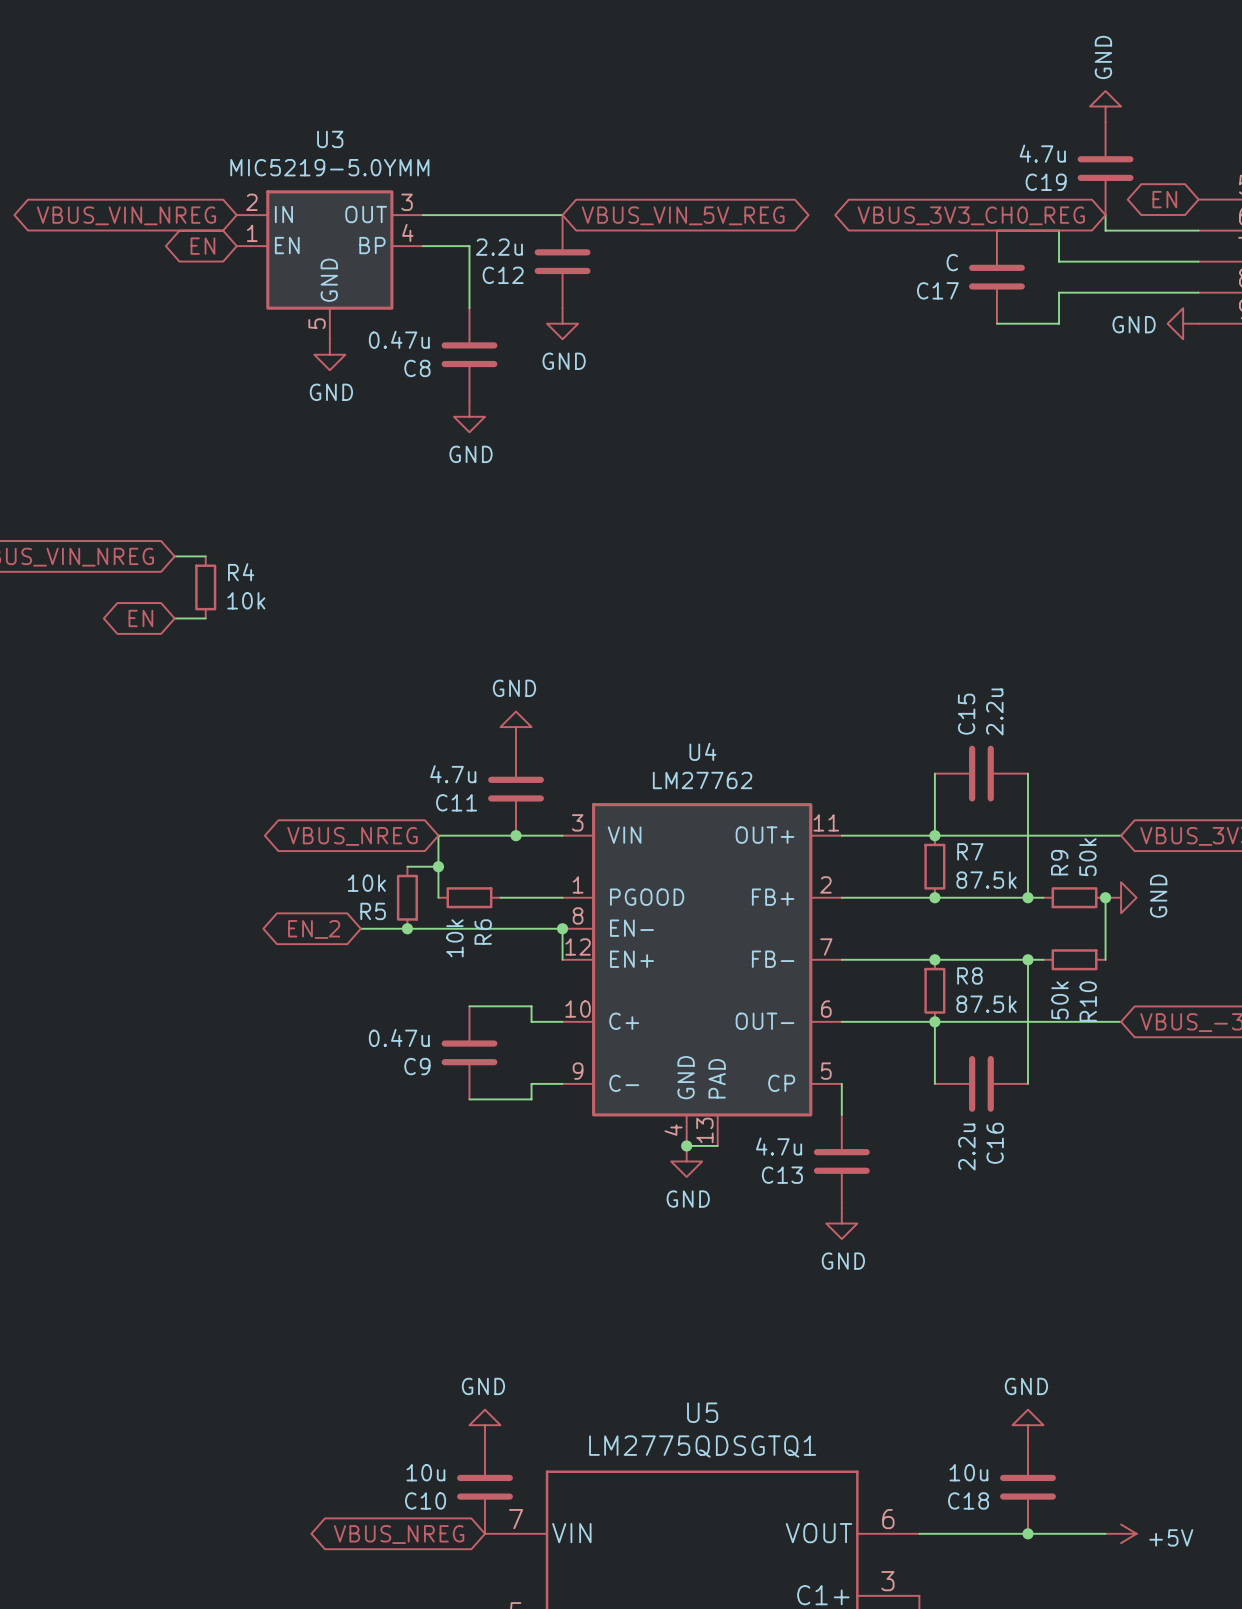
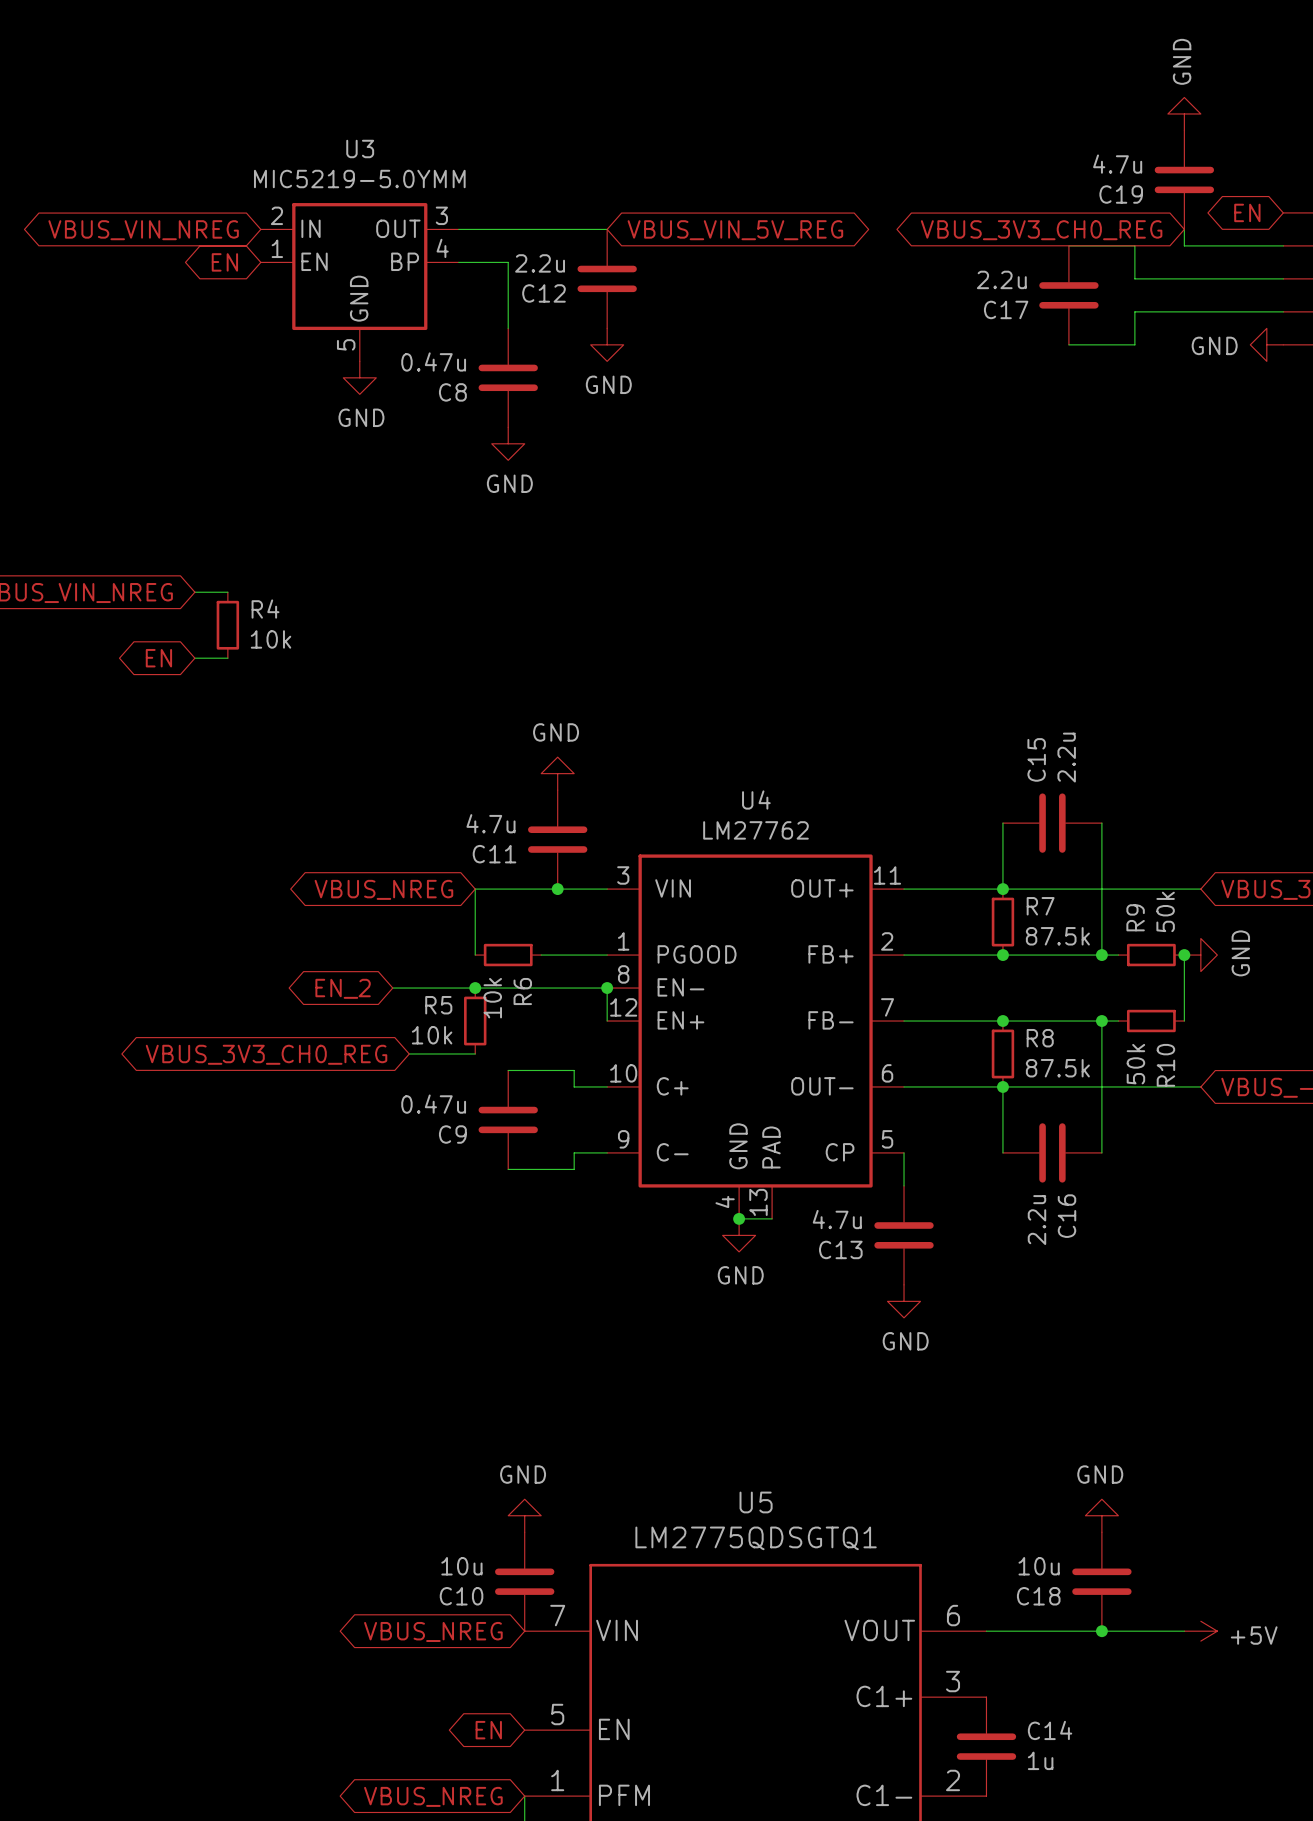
C17 value: C (952, 262) -> 2.2u (1001, 279)
wire: (407, 866) (438, 866) -> none
junction: (438, 866) -> none
R5 value position: 10k (366, 883) -> 10k (432, 1035)
R5 position: (407, 897) -> (475, 1021)
R5 name position: R5 (373, 911) -> R5 (438, 1005)
junction: (407, 928) -> none
junction: none -> (475, 988)
wire: none -> (409, 1053) (475, 1053)
global label: none -> VBUS_3V3_CH0_REG (266, 1054)

